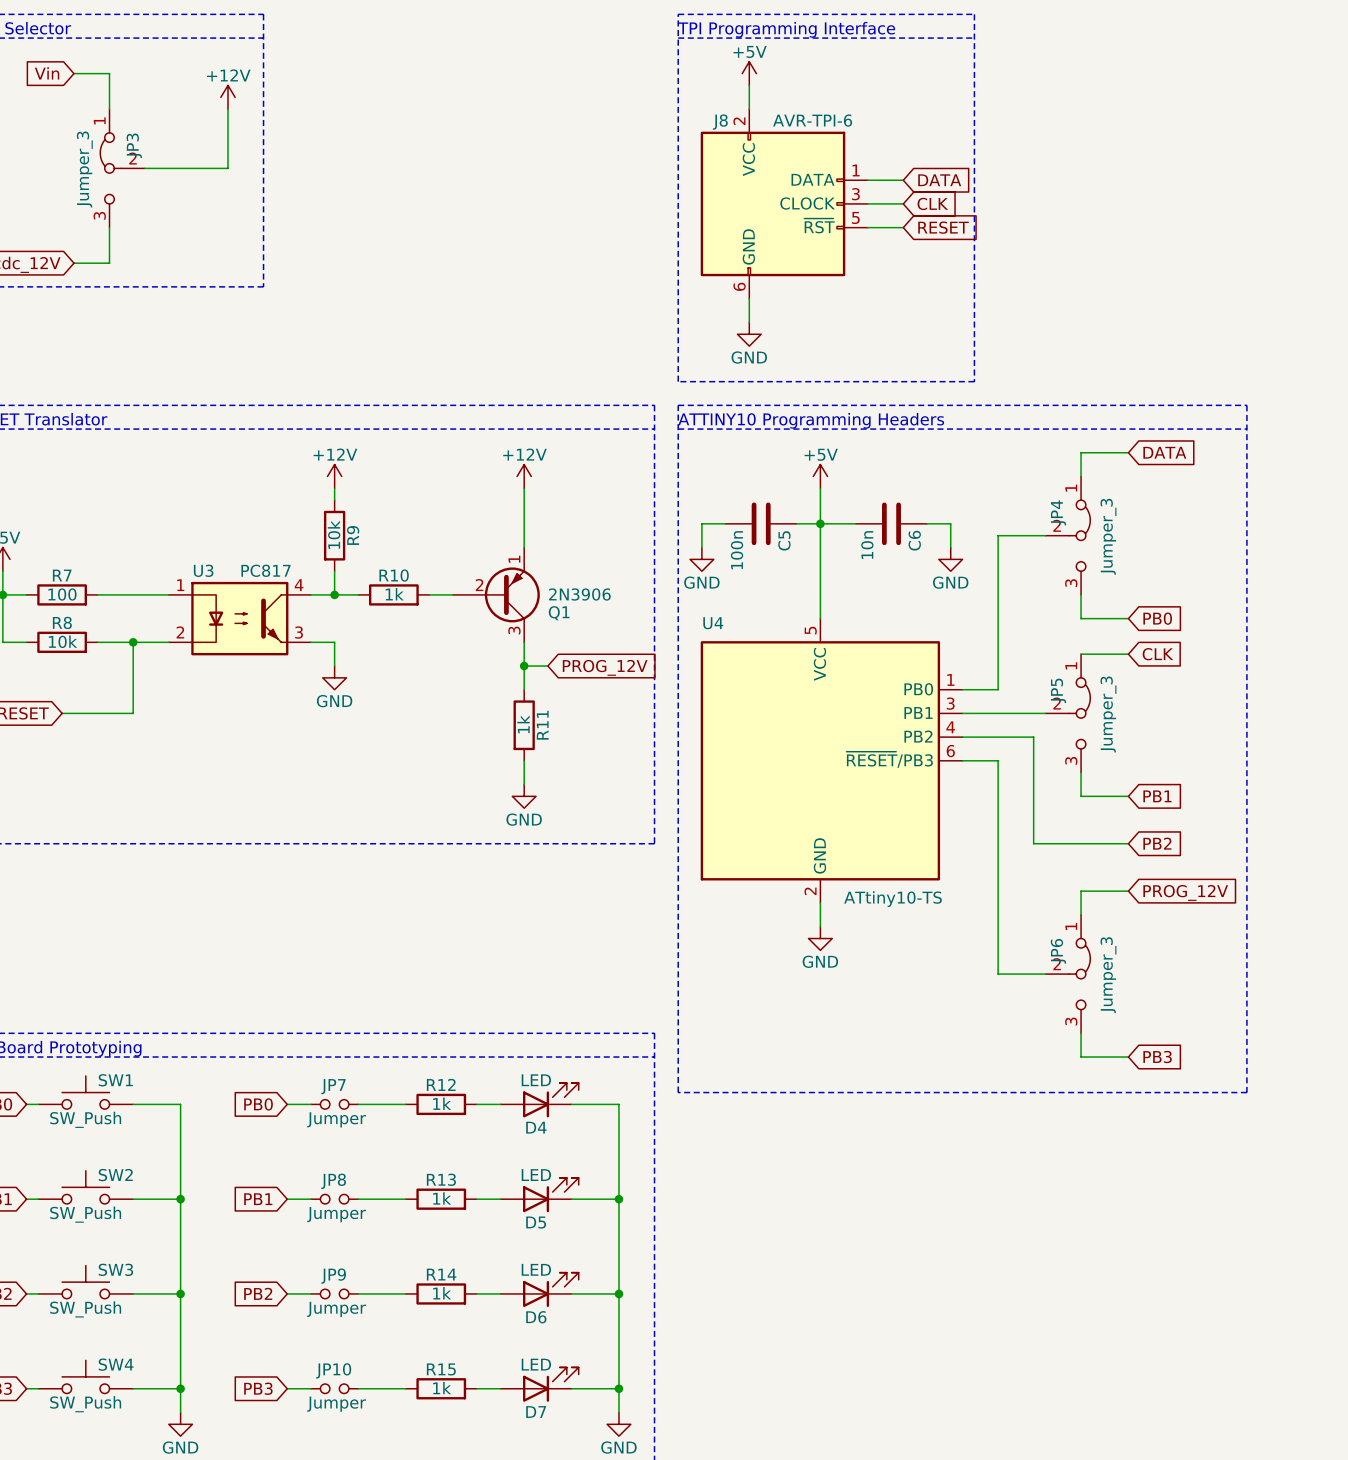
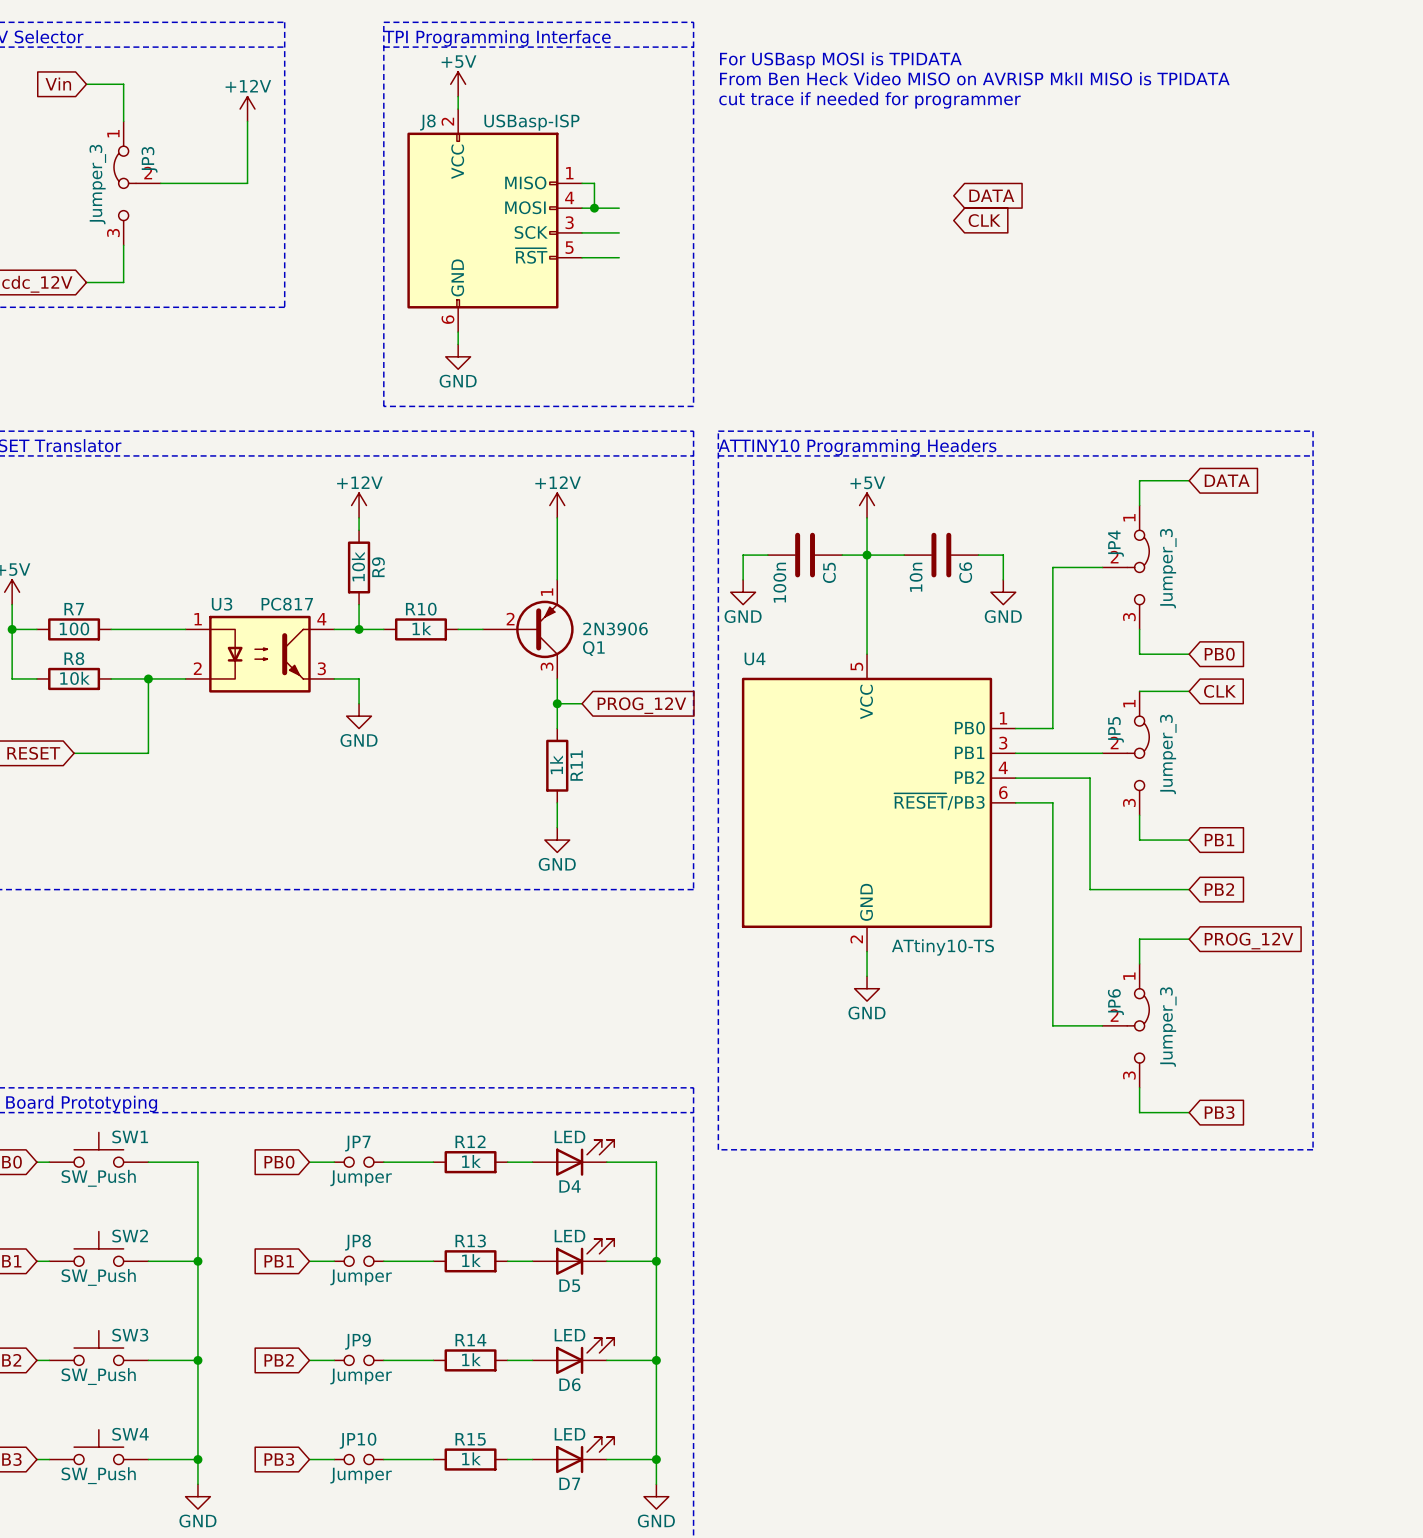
line: none -> (383, 22) (693, 22) (693, 406) (383, 406) (383, 22)
line: (678, 14) (974, 14) (974, 381) (678, 381) (678, 14) -> none
text: none -> TPI Programming Interface (497, 38)
text: TPI Programming Interface (786, 29) -> none
line: none -> (383, 47) (693, 47)
line: (678, 38) (974, 38) -> none
text: none -> For USBasp MOSI is TPIDATA (840, 60)
text: none -> From Ben Heck Video MISO on AVRISP MkII MISO is TPIDATA (974, 78)
power symbol: none -> +5V (458, 84)
power symbol: +5V (749, 73) -> none
wire: none -> (458, 96) (458, 109)
wire: (749, 85) (749, 109) -> none
text: none -> cut trace if needed for programmer (869, 100)
J8 symbol: [700, 109, 868, 299] -> [407, 109, 583, 333]
J8 value: AVR-TPI-6 (812, 120) -> USBasp-ISP (531, 122)
wire: none -> (582, 183) (594, 183) (594, 208)
wire: (867, 180) (903, 180) -> none
wire: none -> (582, 208) (619, 208)
junction: none -> (594, 208)
wire: (867, 203) (903, 203) -> none
wire: none -> (582, 232) (619, 232)
wire: (867, 227) (903, 227) -> none
global label: RESET (943, 227) -> none
wire: none -> (582, 257) (619, 257)
wire: (749, 298) (749, 322) -> none
wire: none -> (458, 332) (458, 344)
power symbol: none -> GND (458, 356)
power symbol: GND (749, 334) -> none

